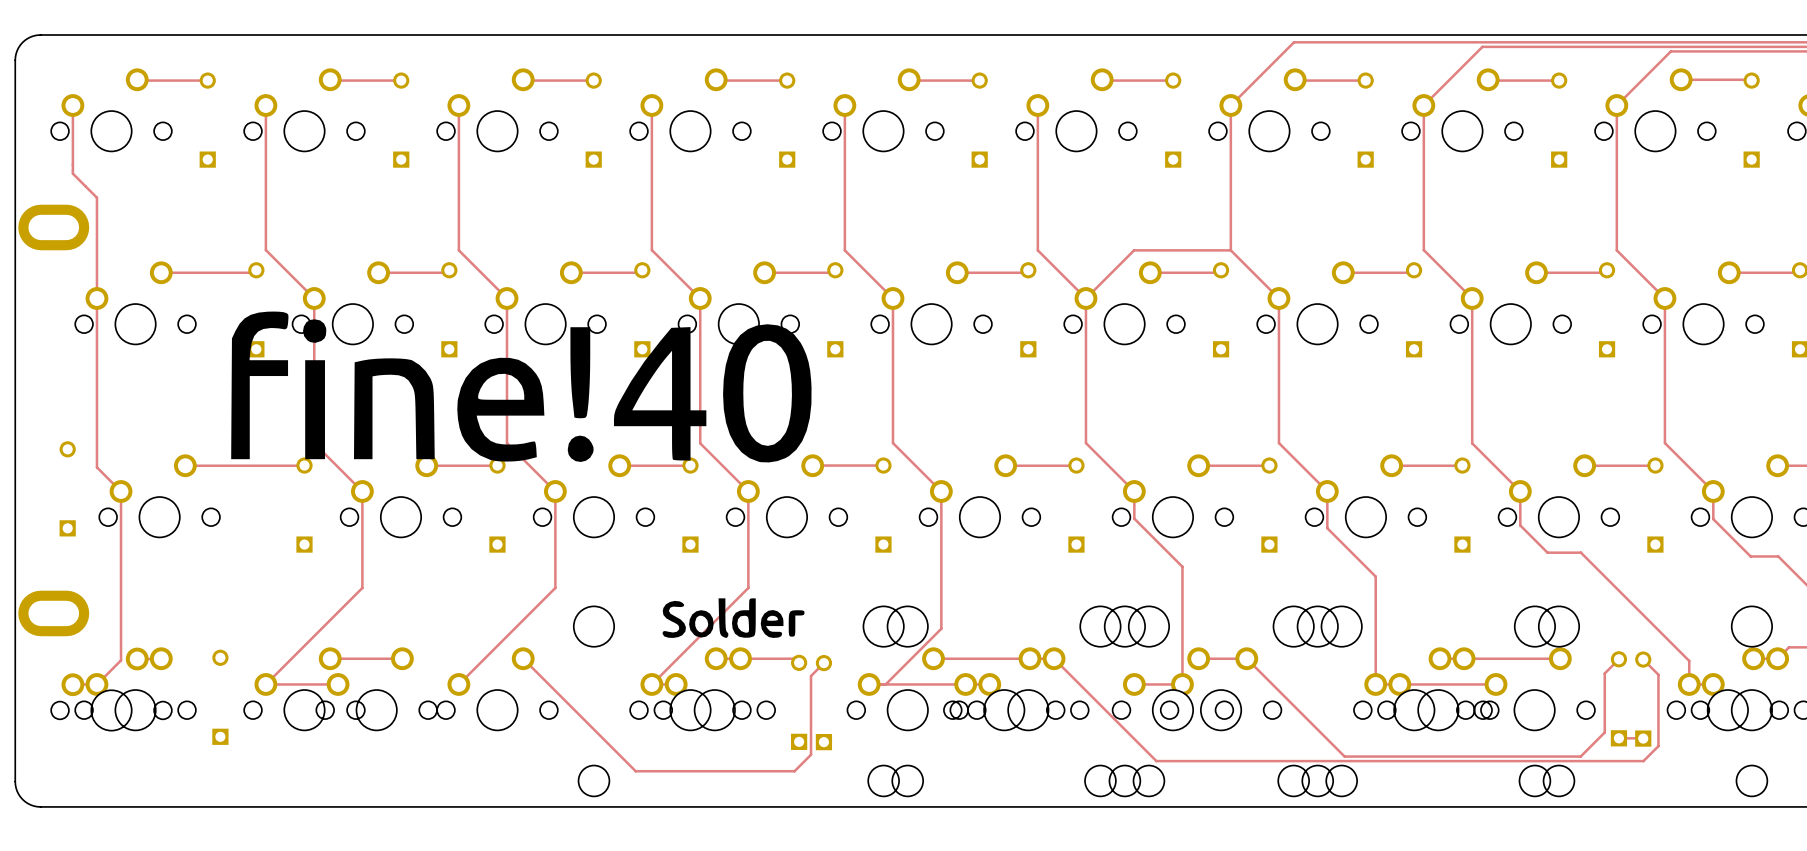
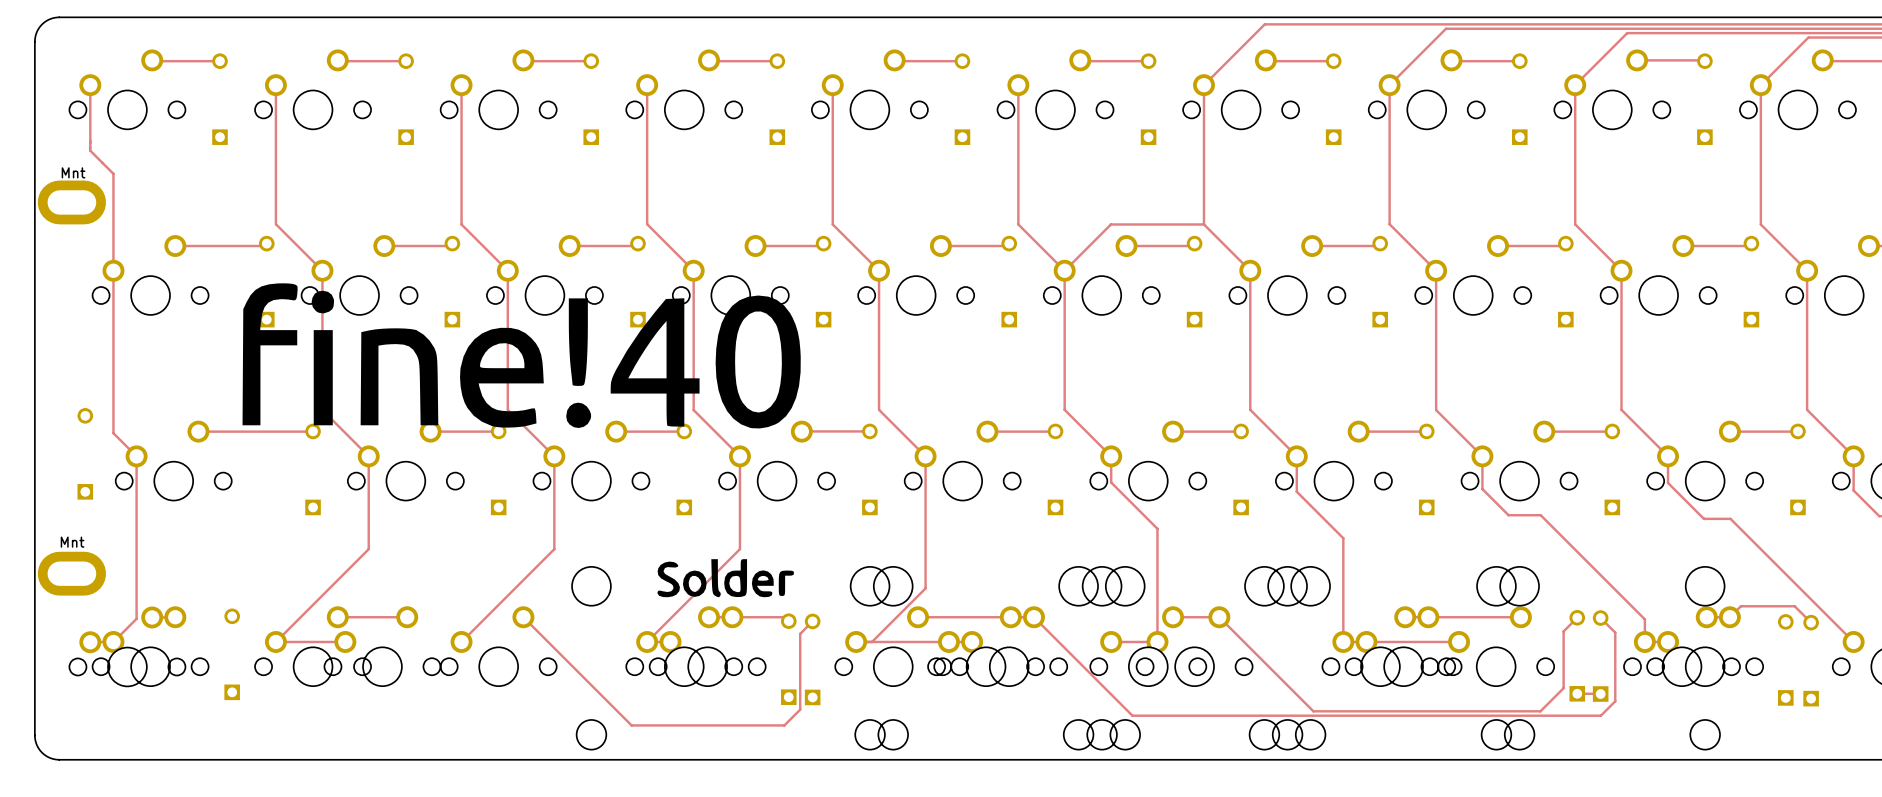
Mnt name: none -> Mnt (73, 172)
Mnt name: none -> Mnt (72, 542)

